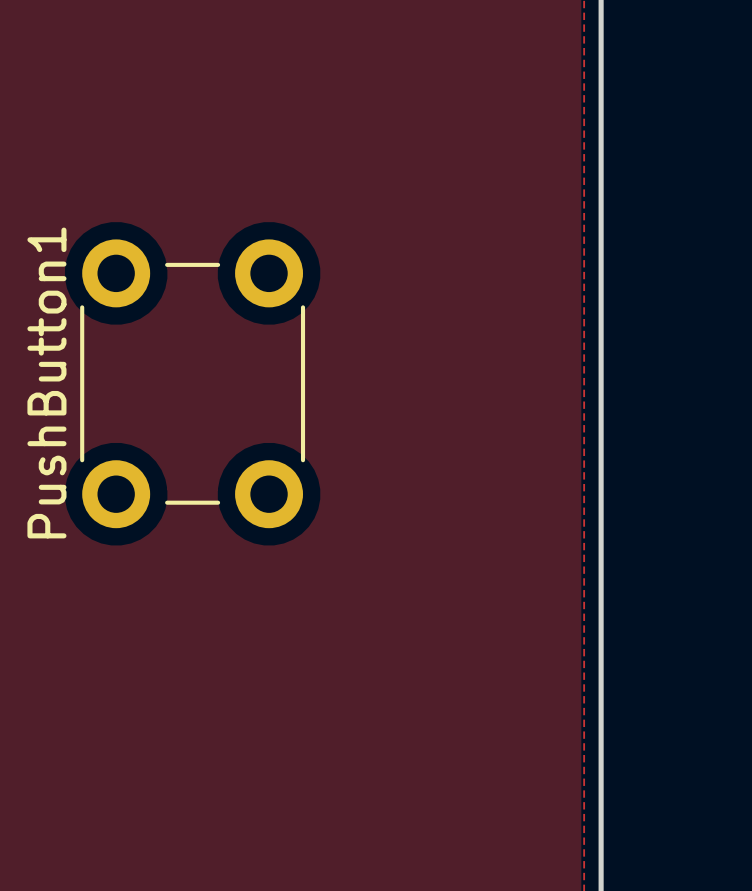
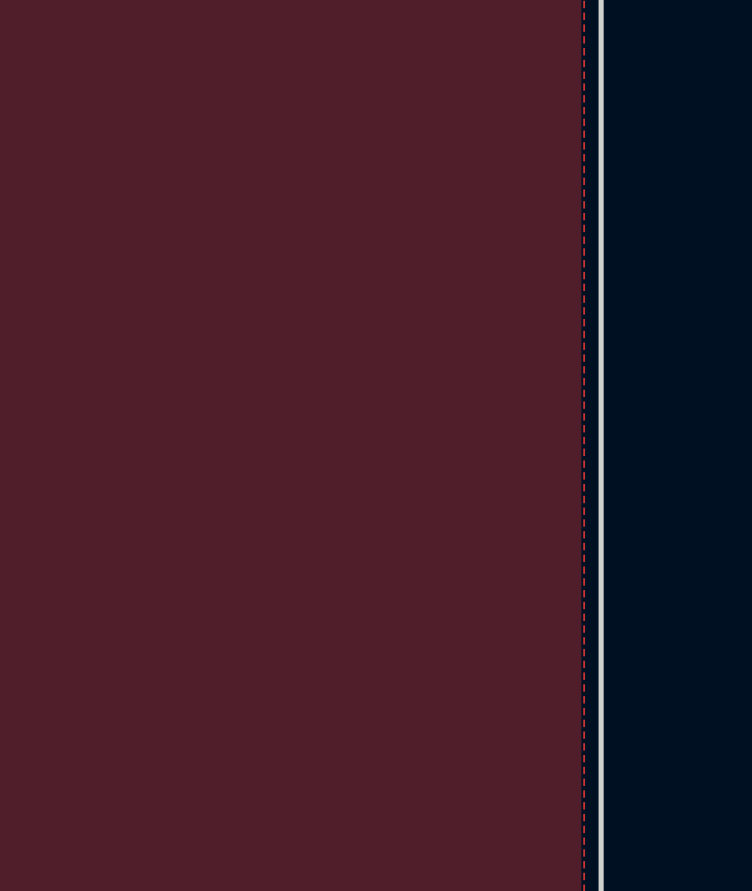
PushButton1: (192, 383) -> none

